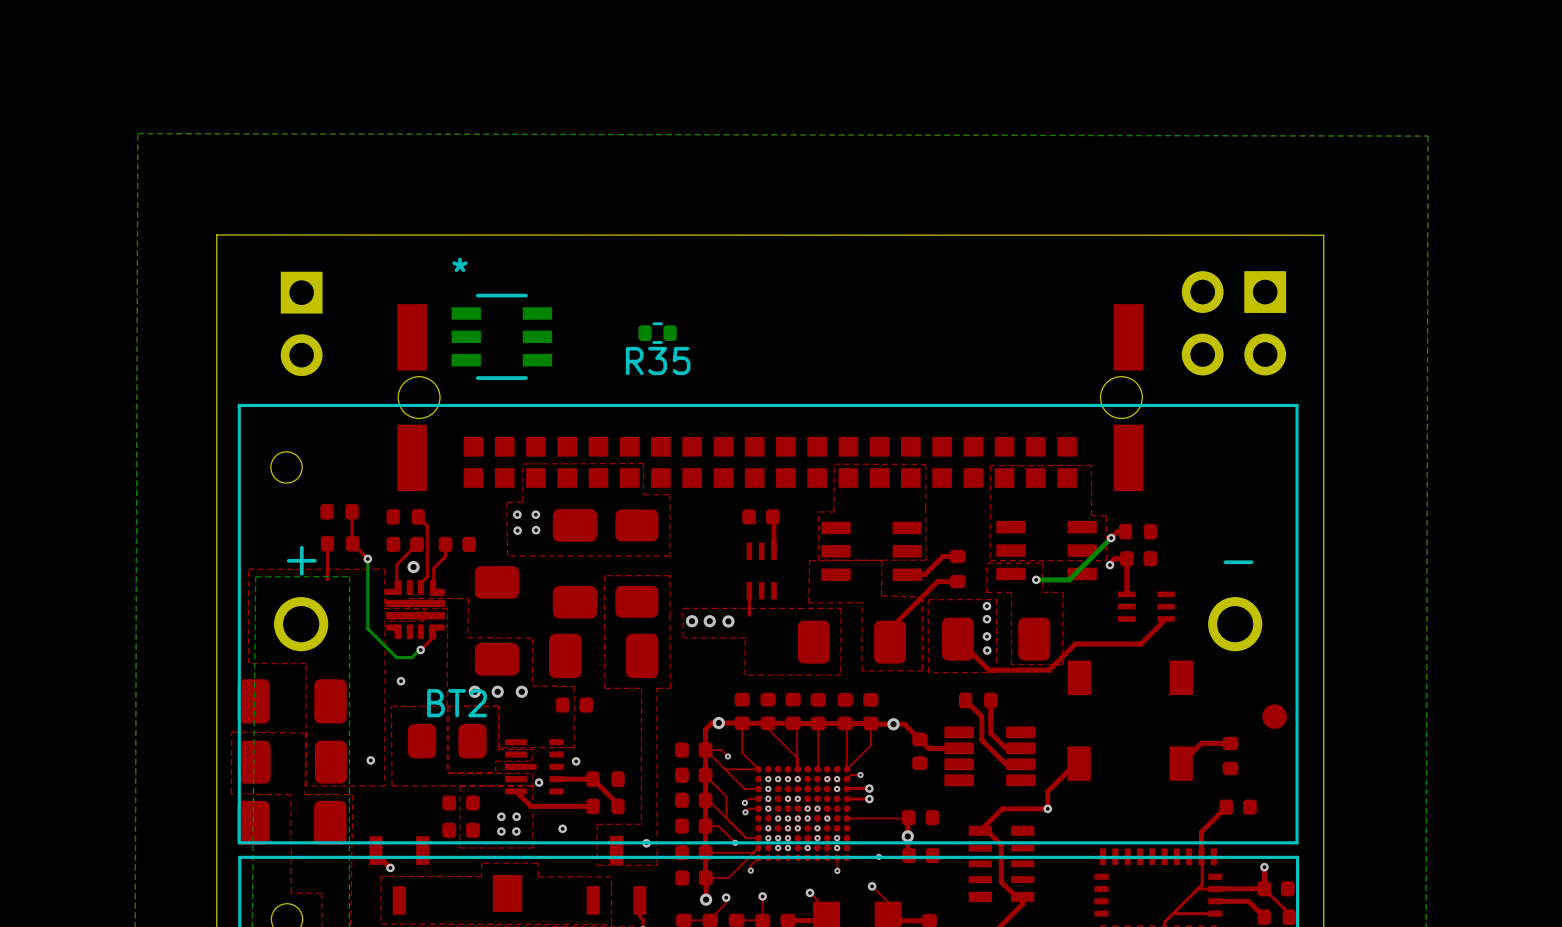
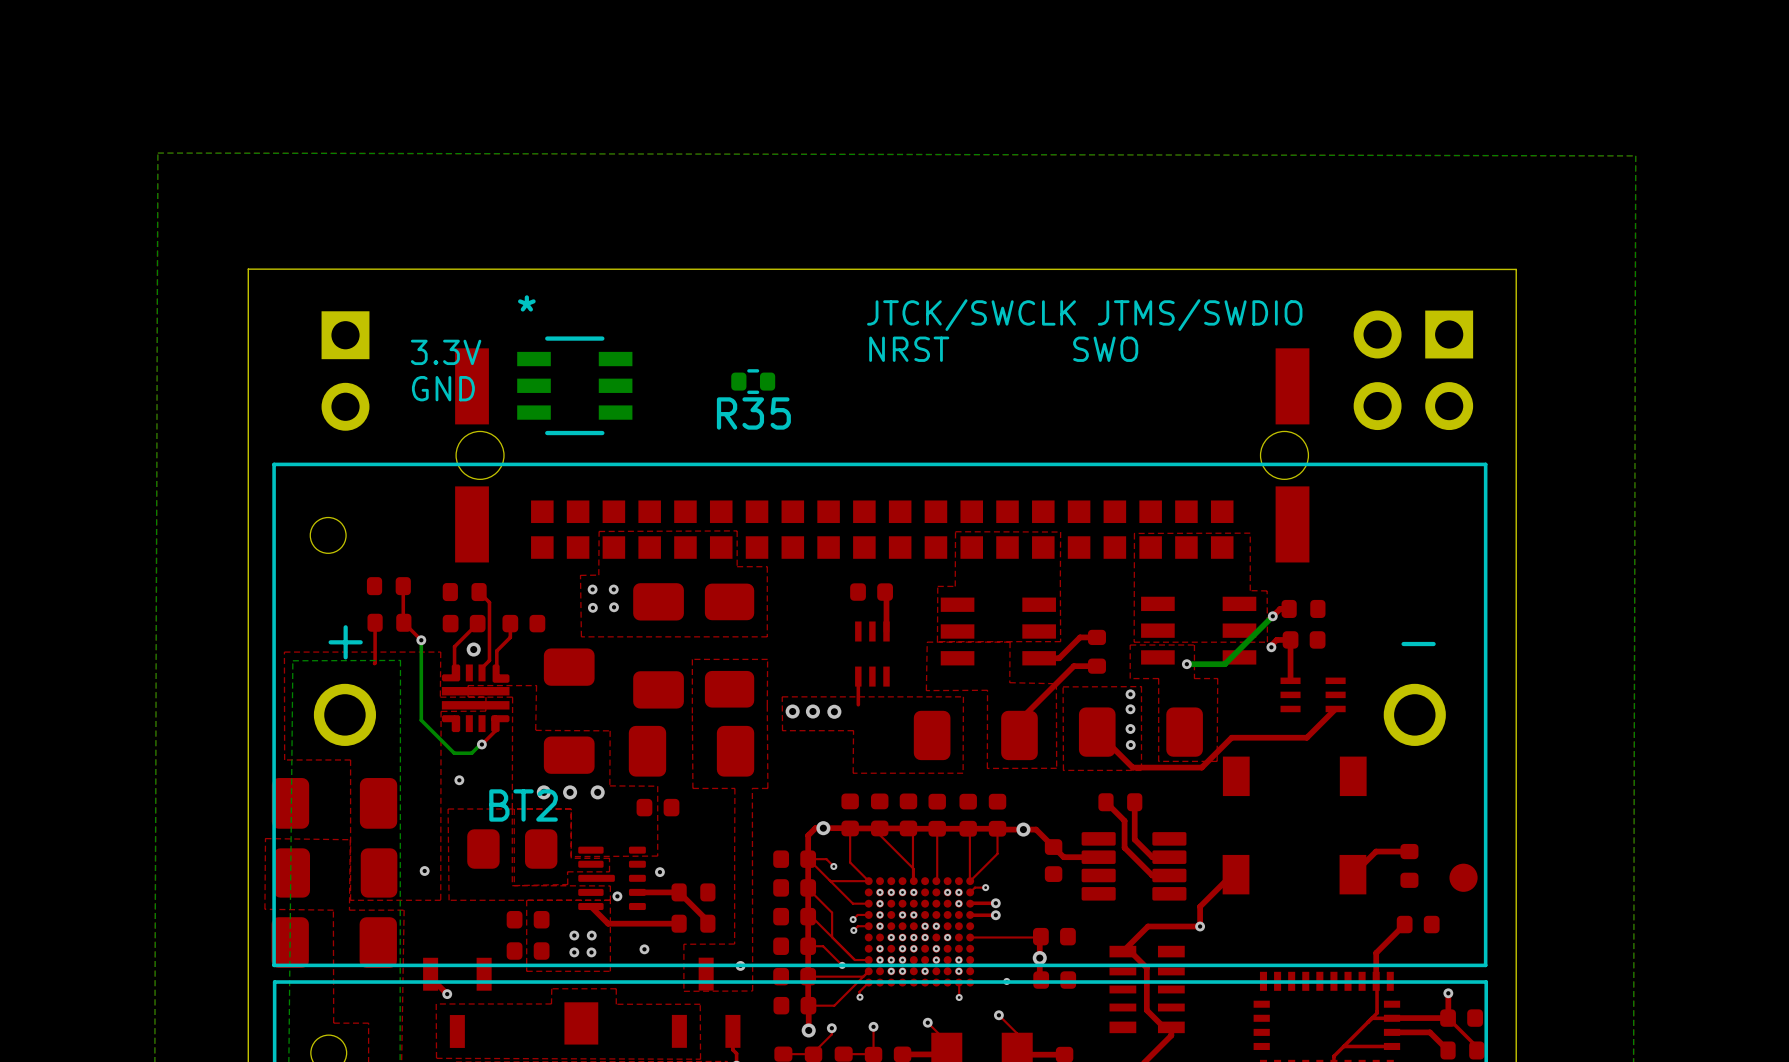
text: none -> JTCK/SWCLK JTMS/SWDIO (1084, 315)
text: none -> NRST SWO (1003, 349)
text: none -> 3.3V (446, 352)
text: none -> GND (443, 388)
part position: (1274, 716) -> (1463, 877)

